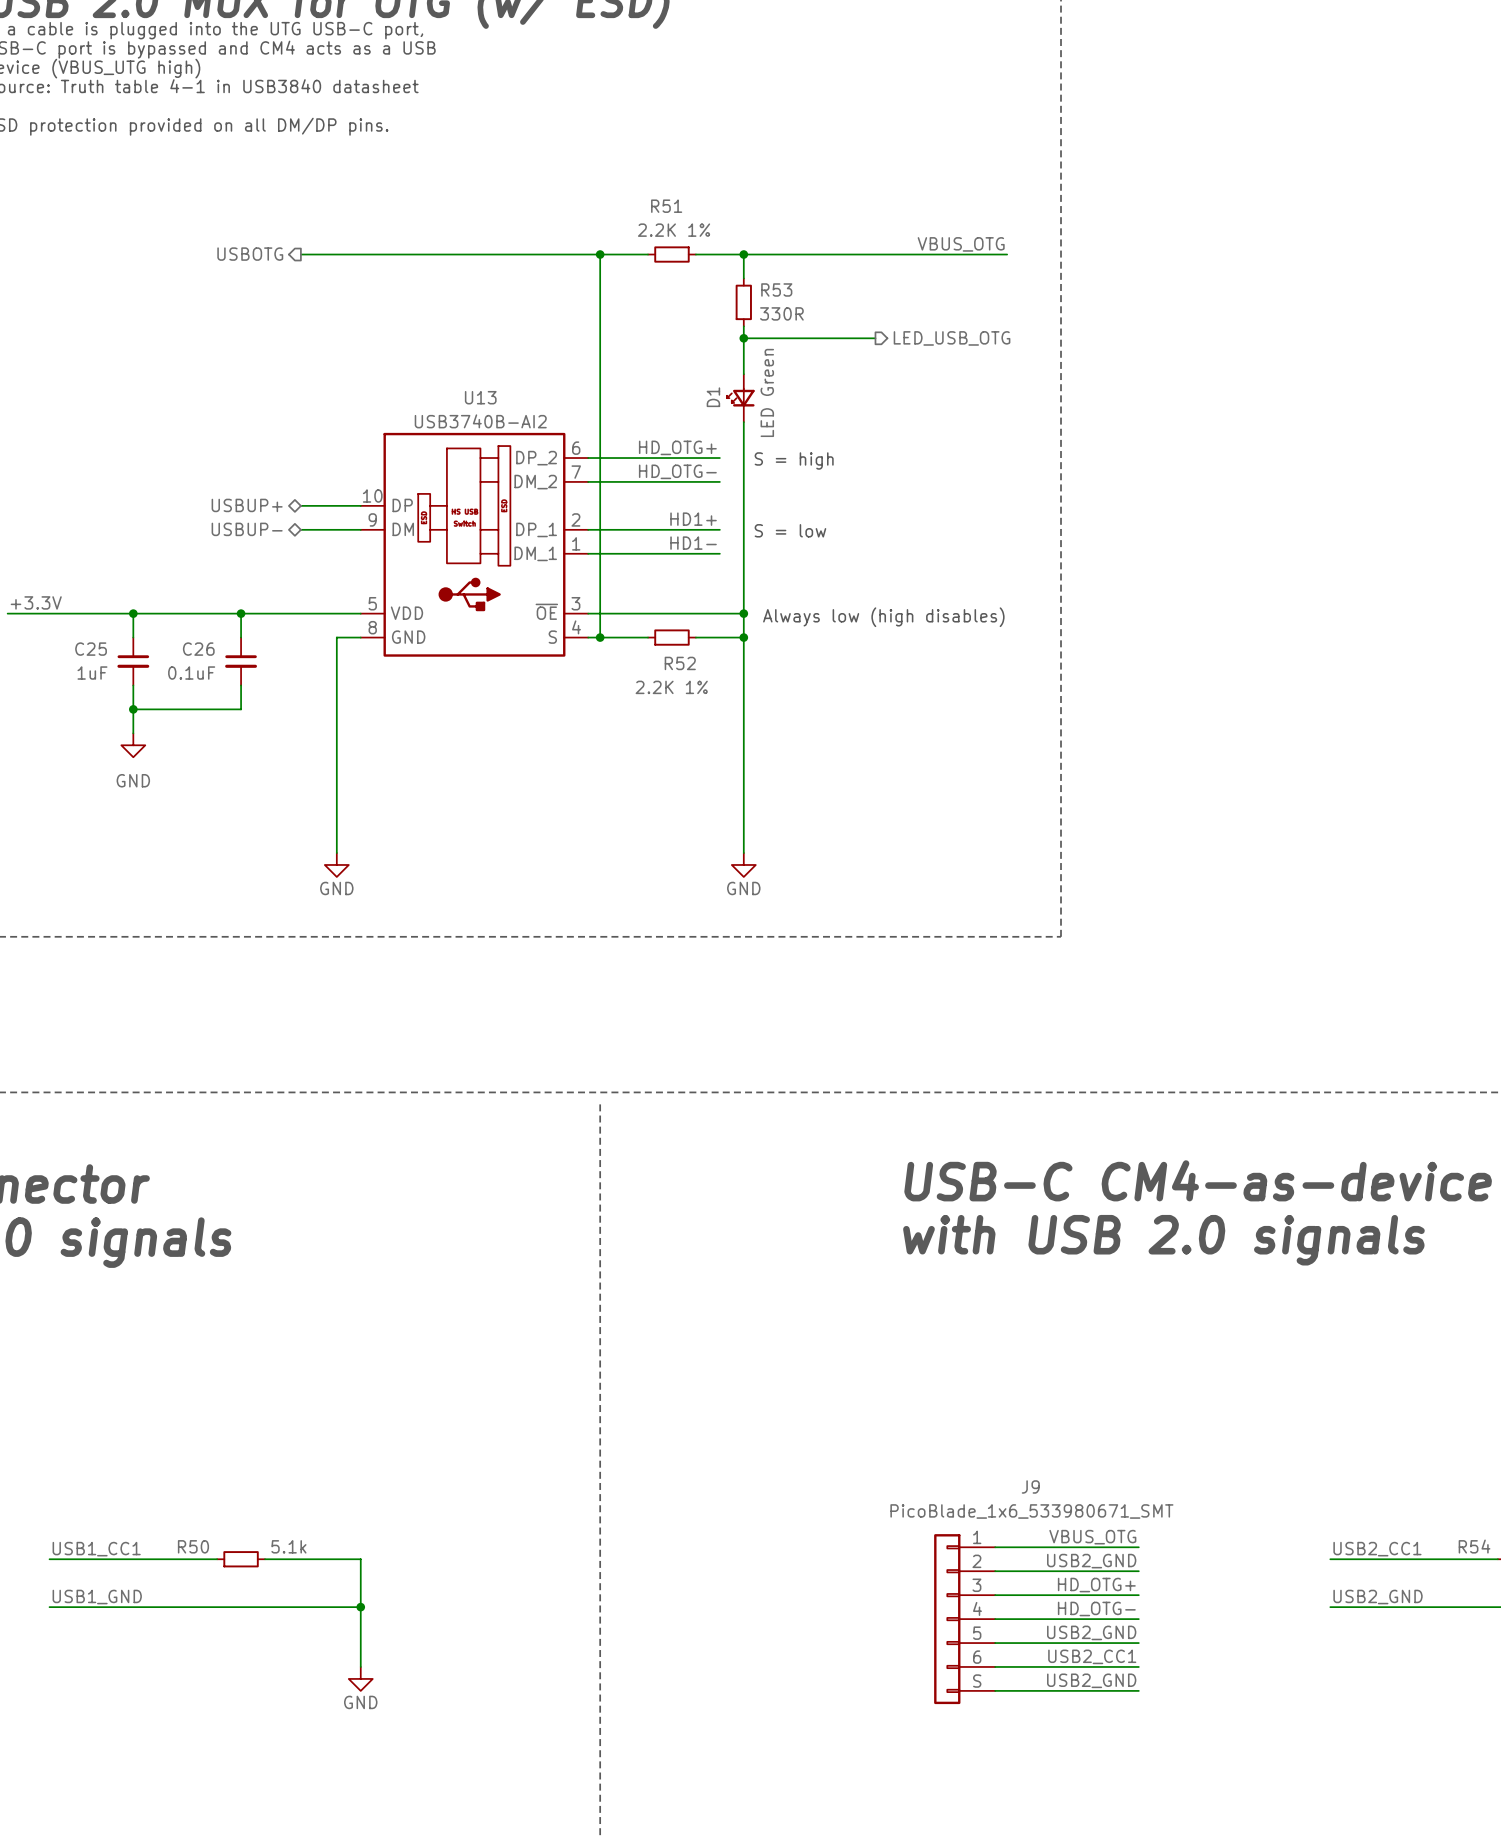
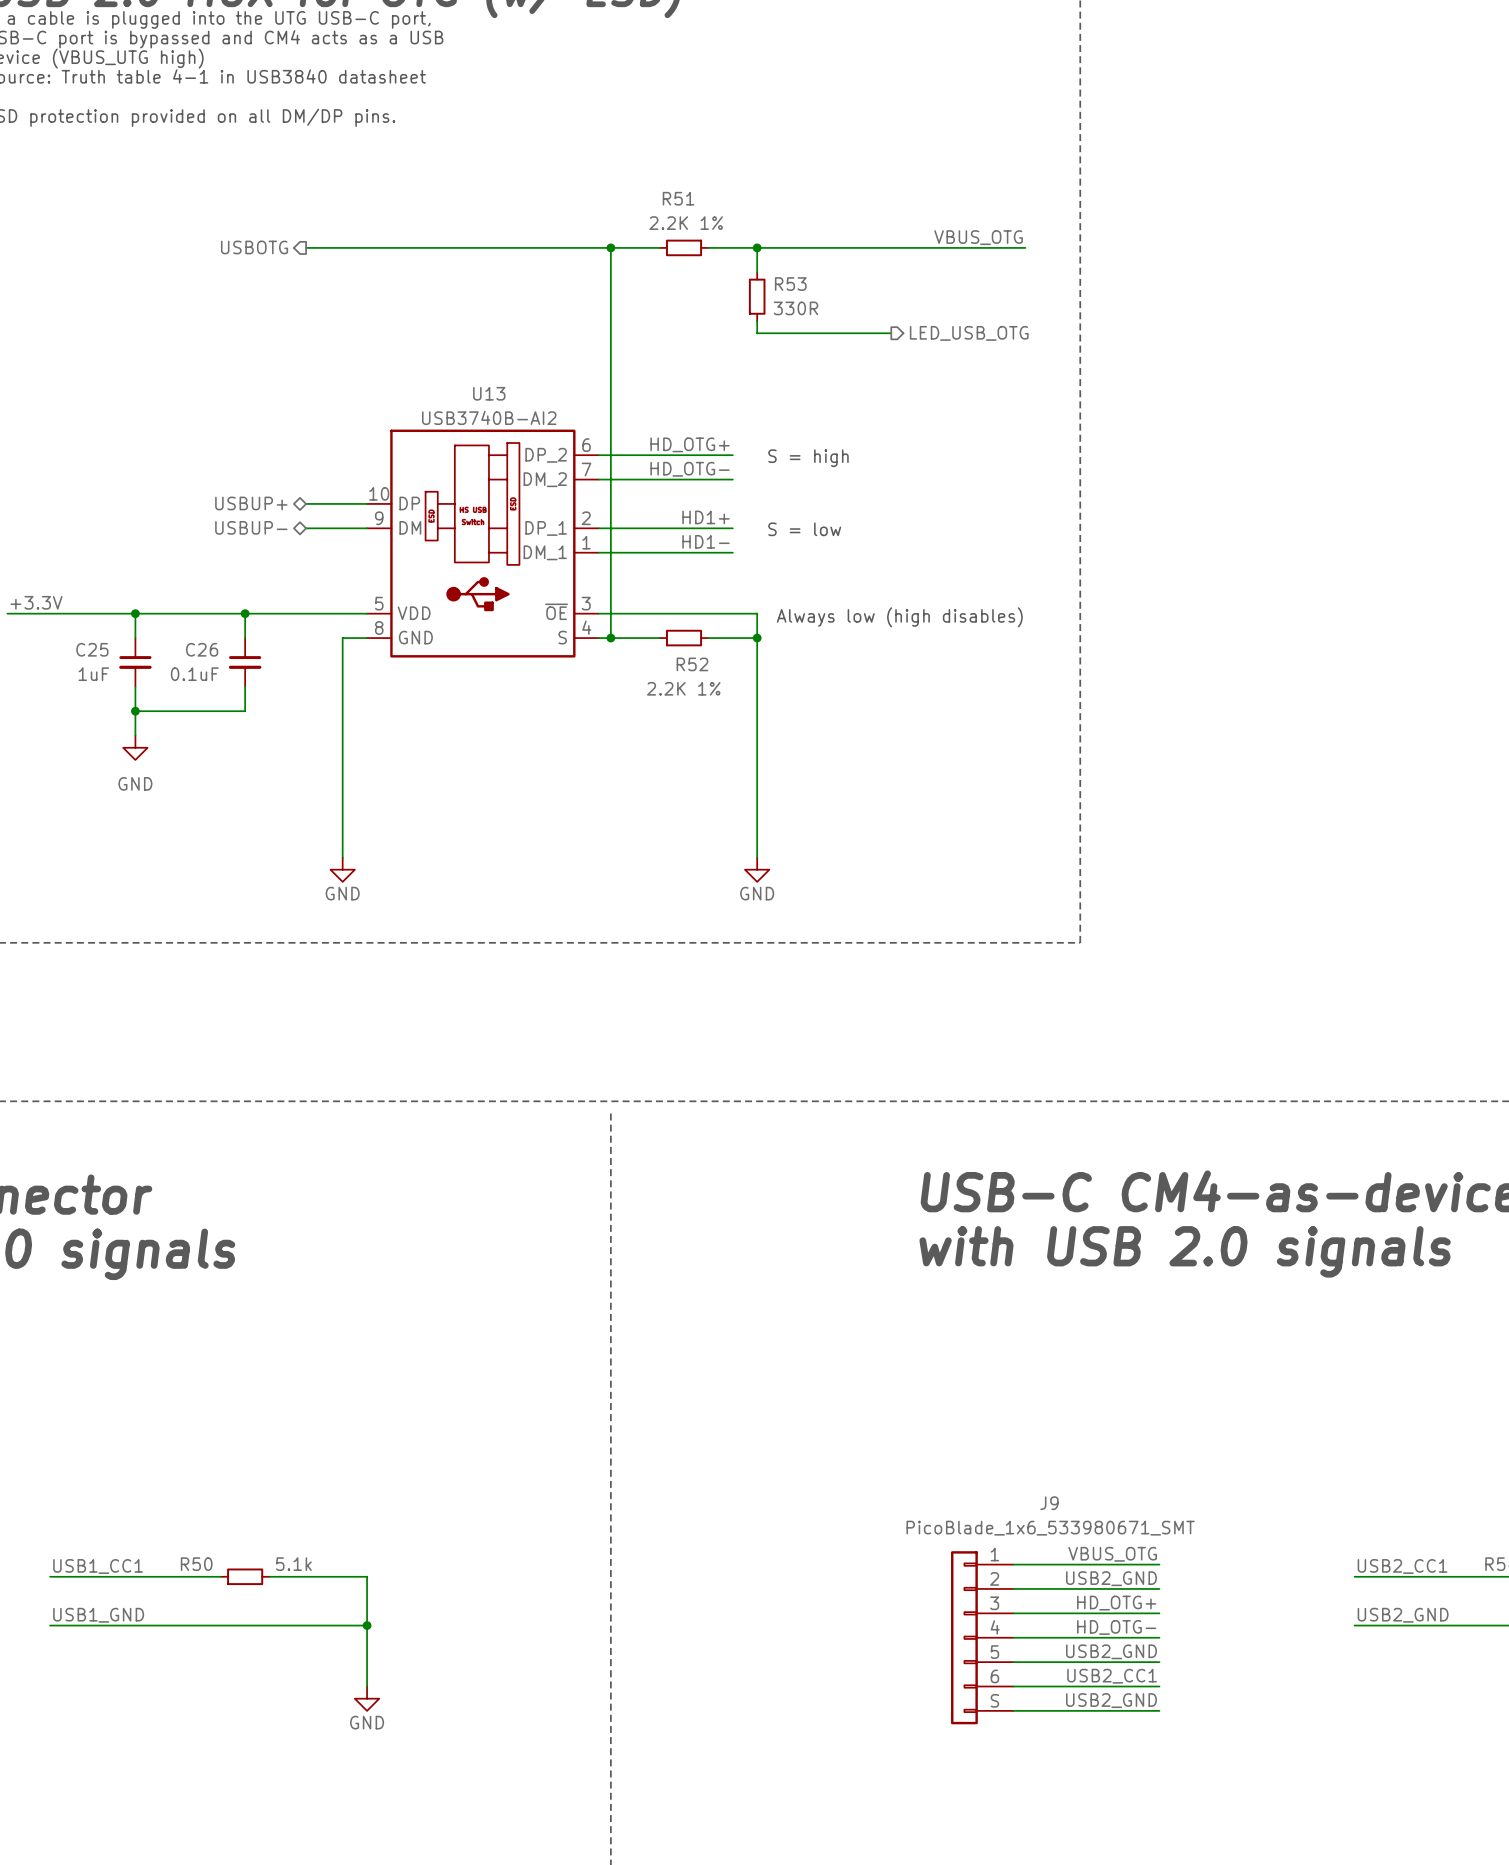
wire: (743, 338) (743, 374) -> none
junction: (743, 338) -> none
D1: LED Green (740, 398) -> none
wire: (743, 422) (743, 613) -> none
junction: (743, 613) -> none

